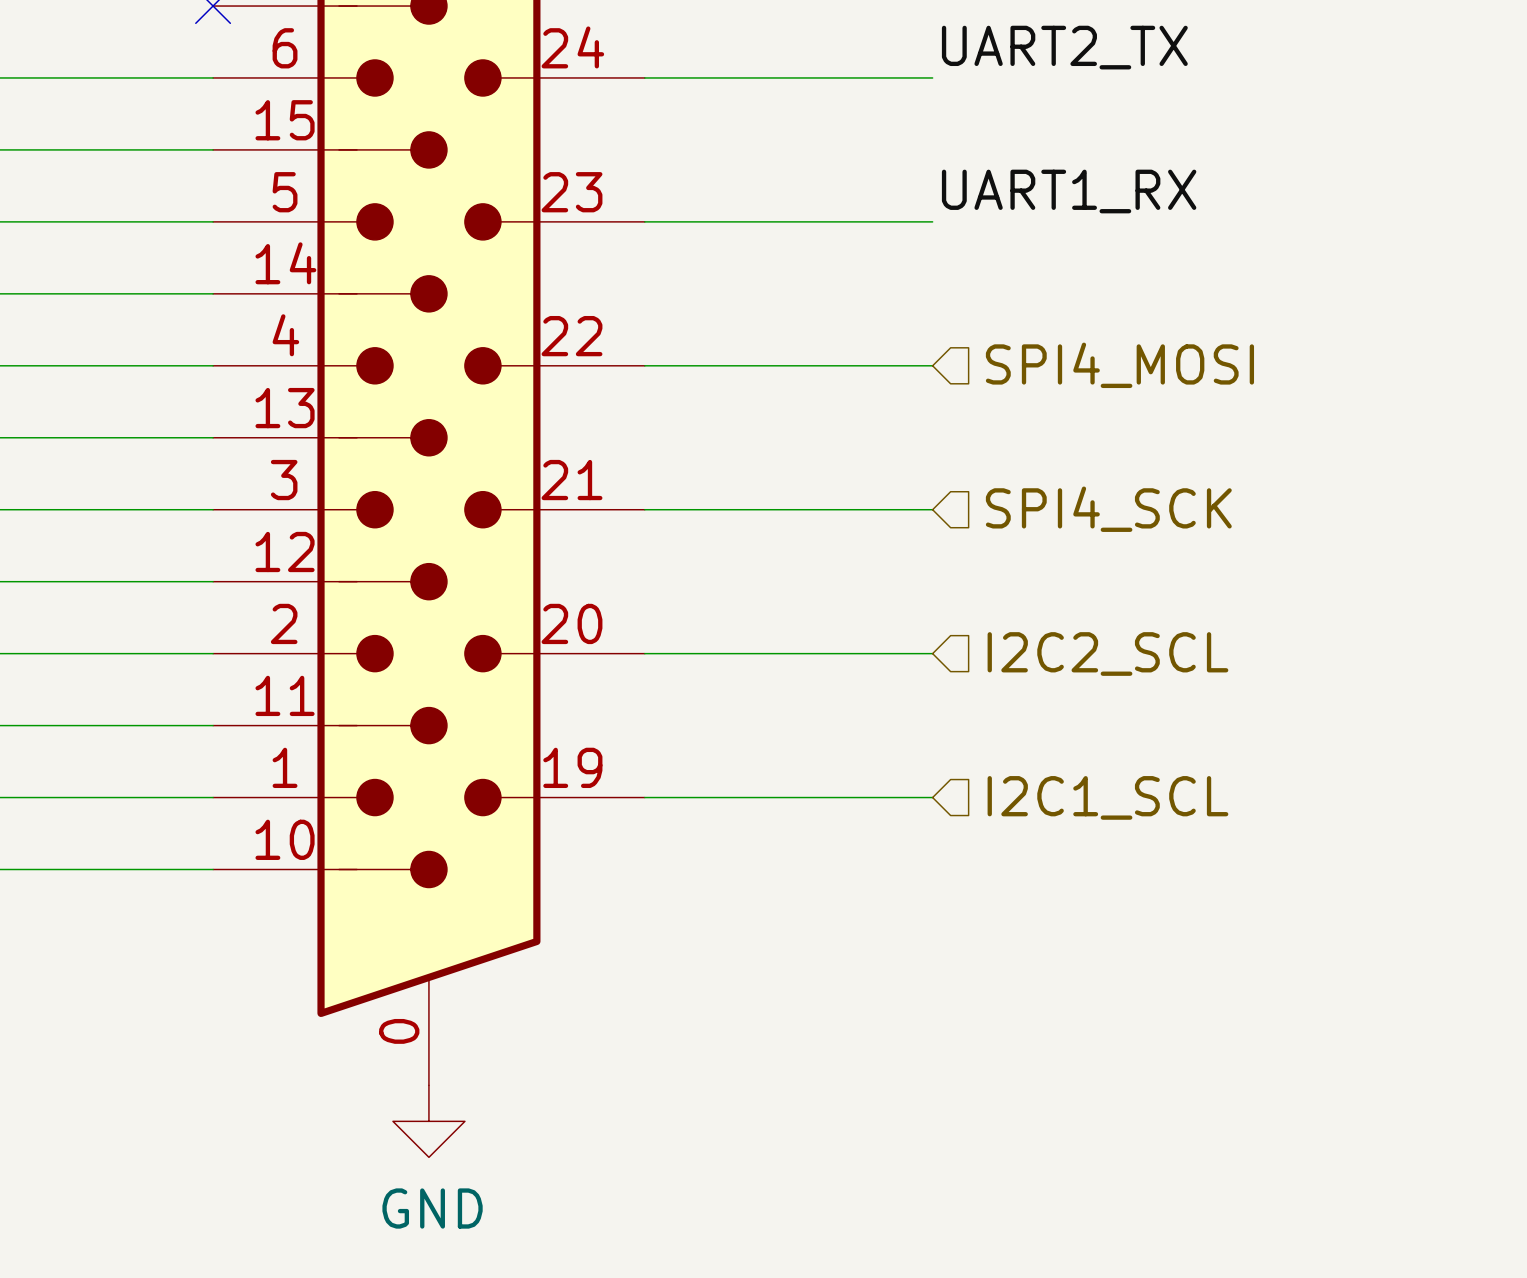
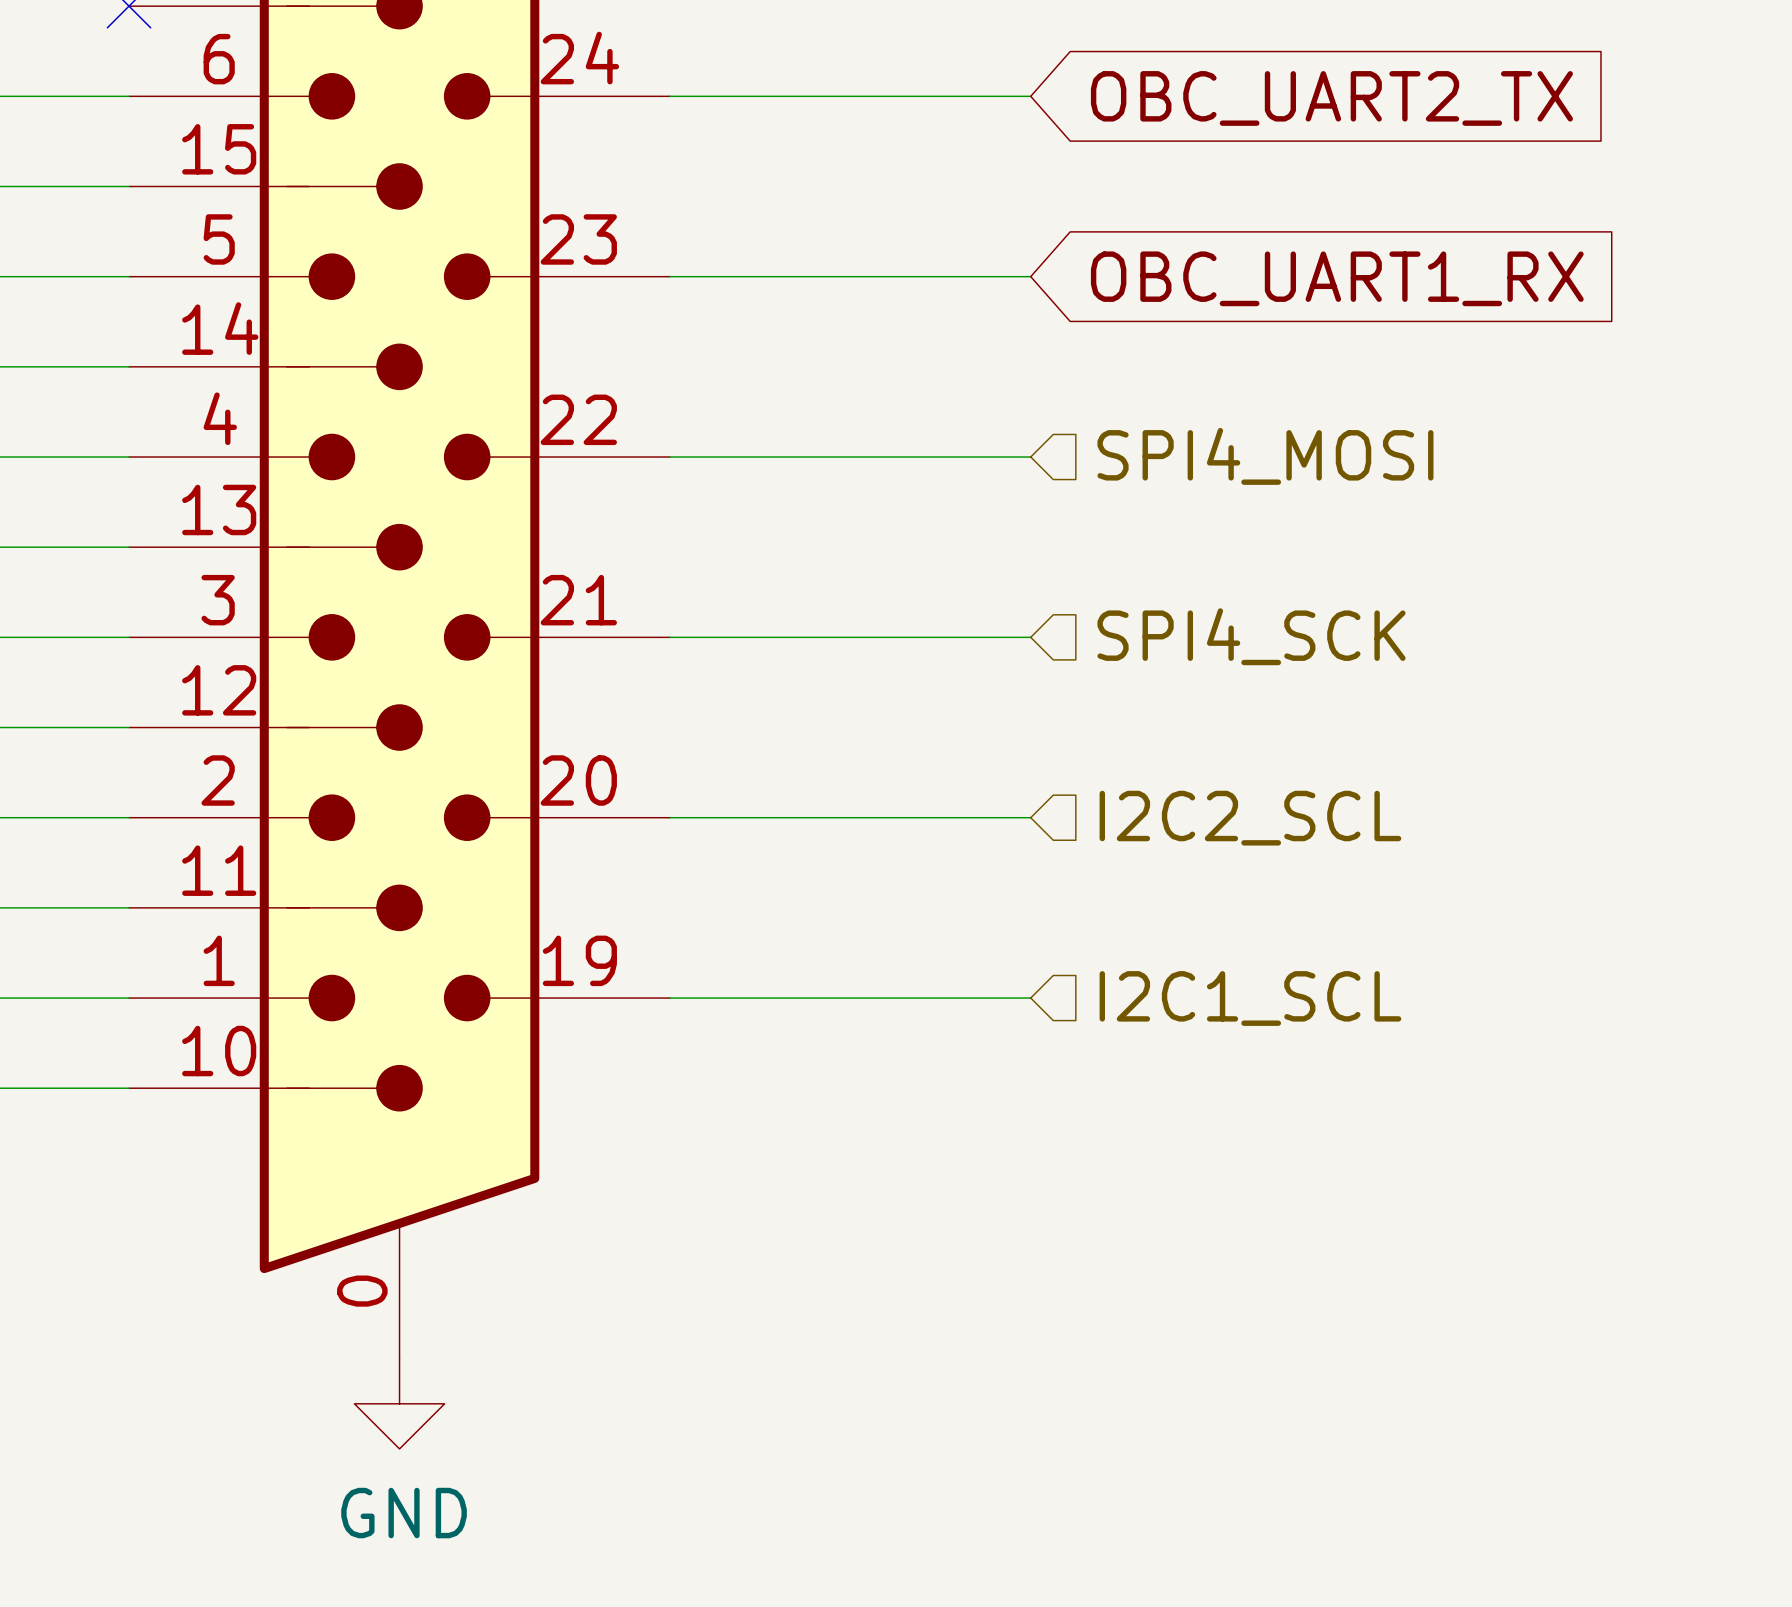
label: UART2_TX (1064, 47) -> none
global label: none -> OBC_UART2_TX (1331, 98)
label: UART1_RX (1069, 191) -> none
global label: none -> OBC_UART1_RX (1337, 278)

